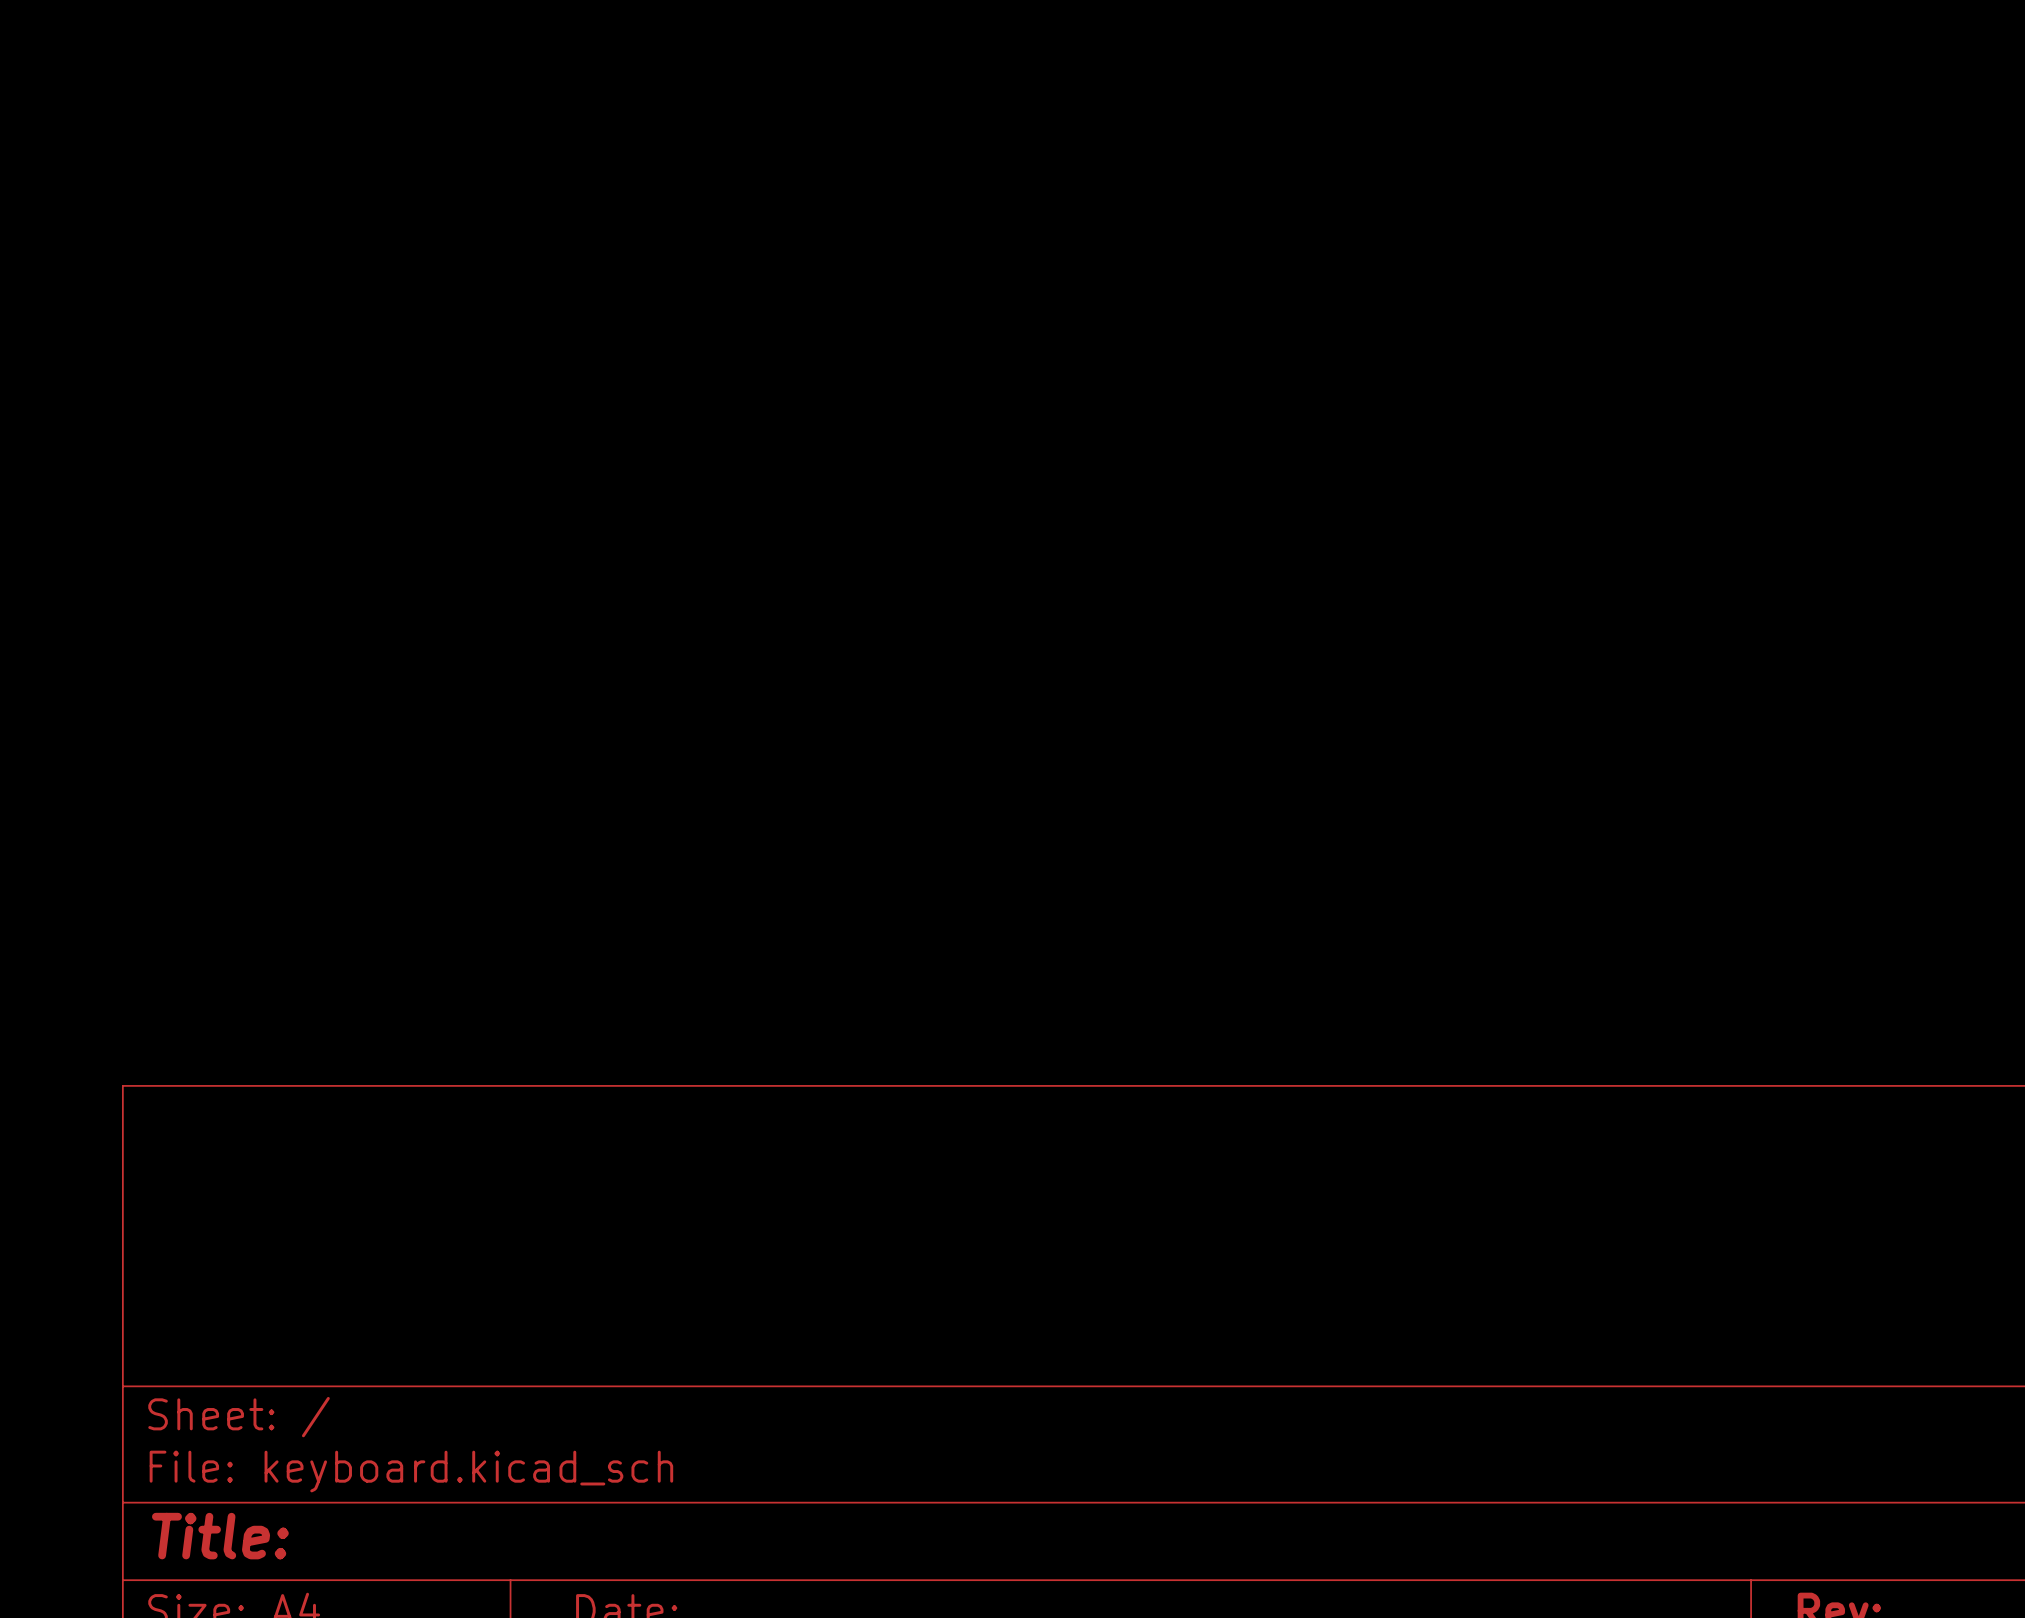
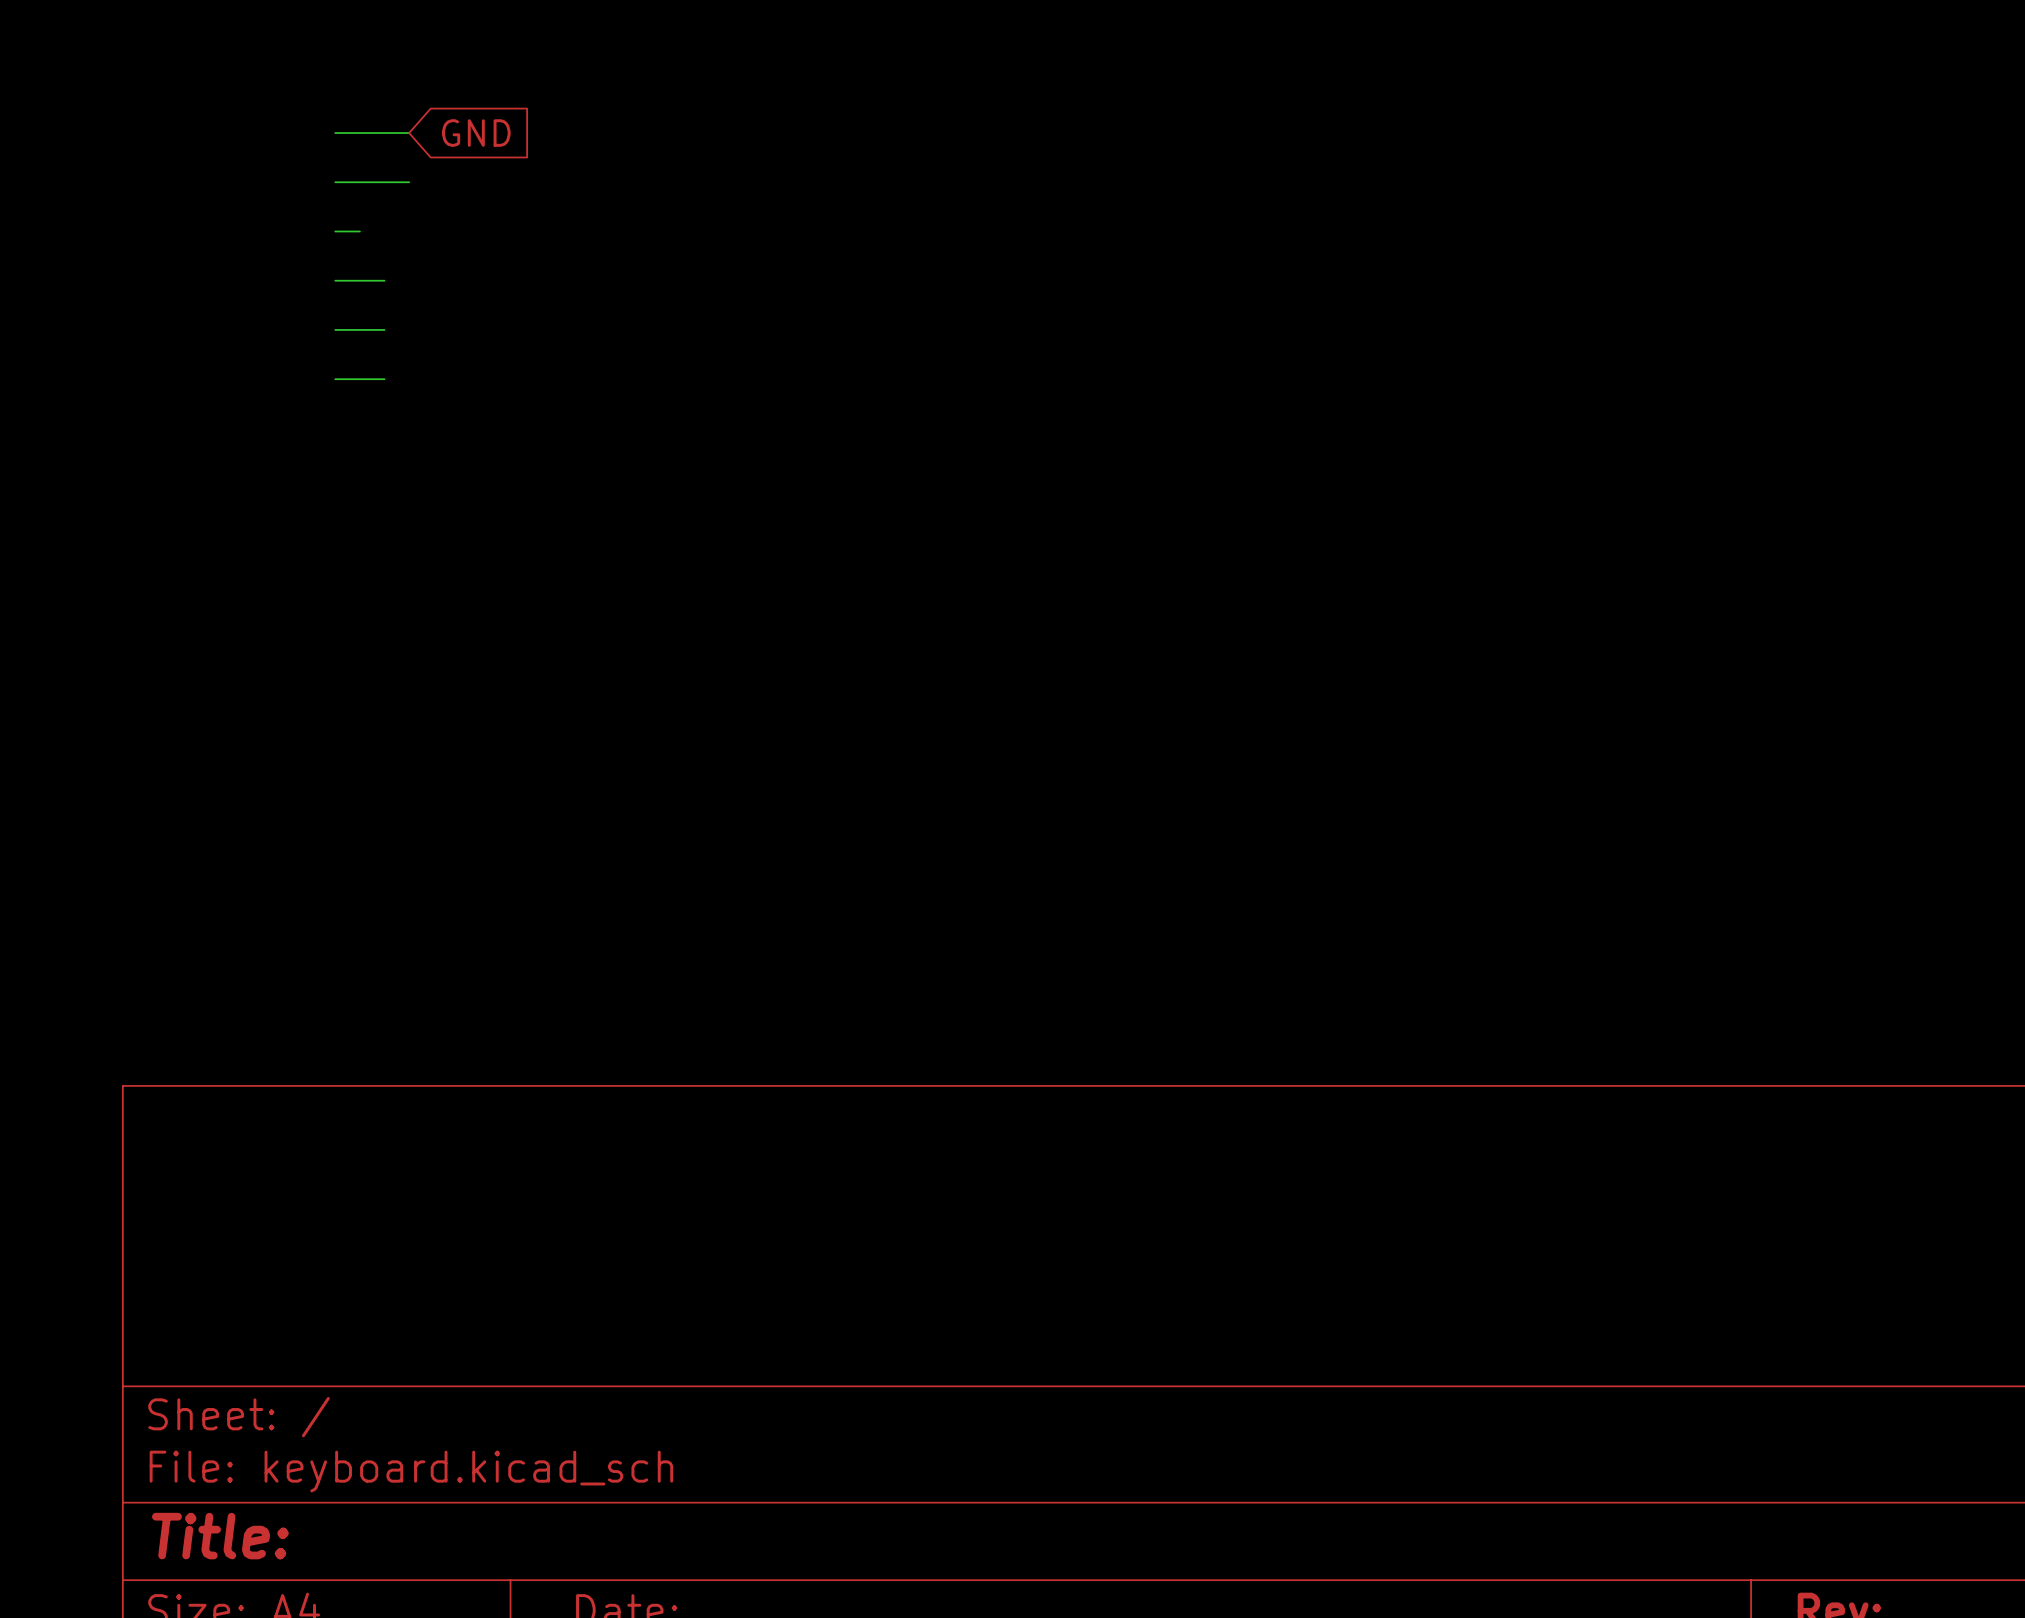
wire: none -> (335, 133) (409, 133)
global label: none -> GND (476, 133)
wire: none -> (335, 182) (409, 182)
wire: none -> (335, 231) (359, 231)
wire: none -> (335, 280) (384, 280)
wire: none -> (335, 329) (384, 329)
wire: none -> (335, 379) (384, 379)

